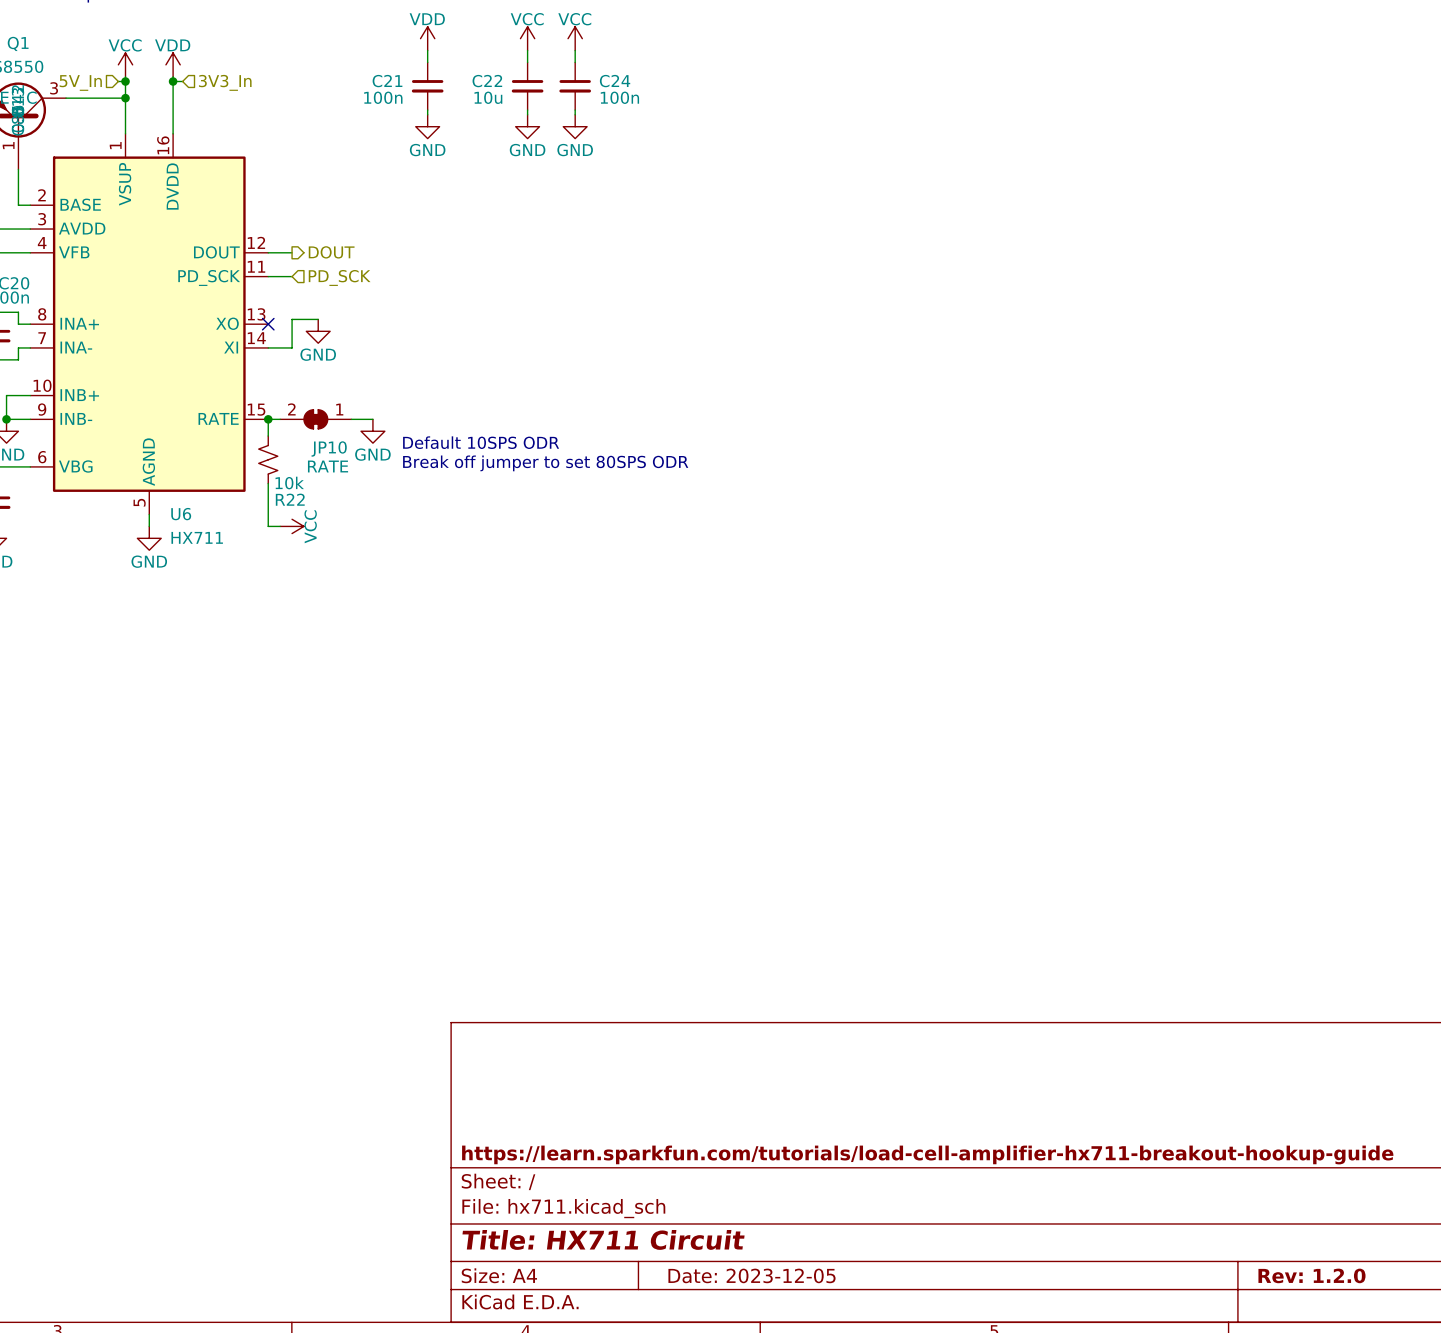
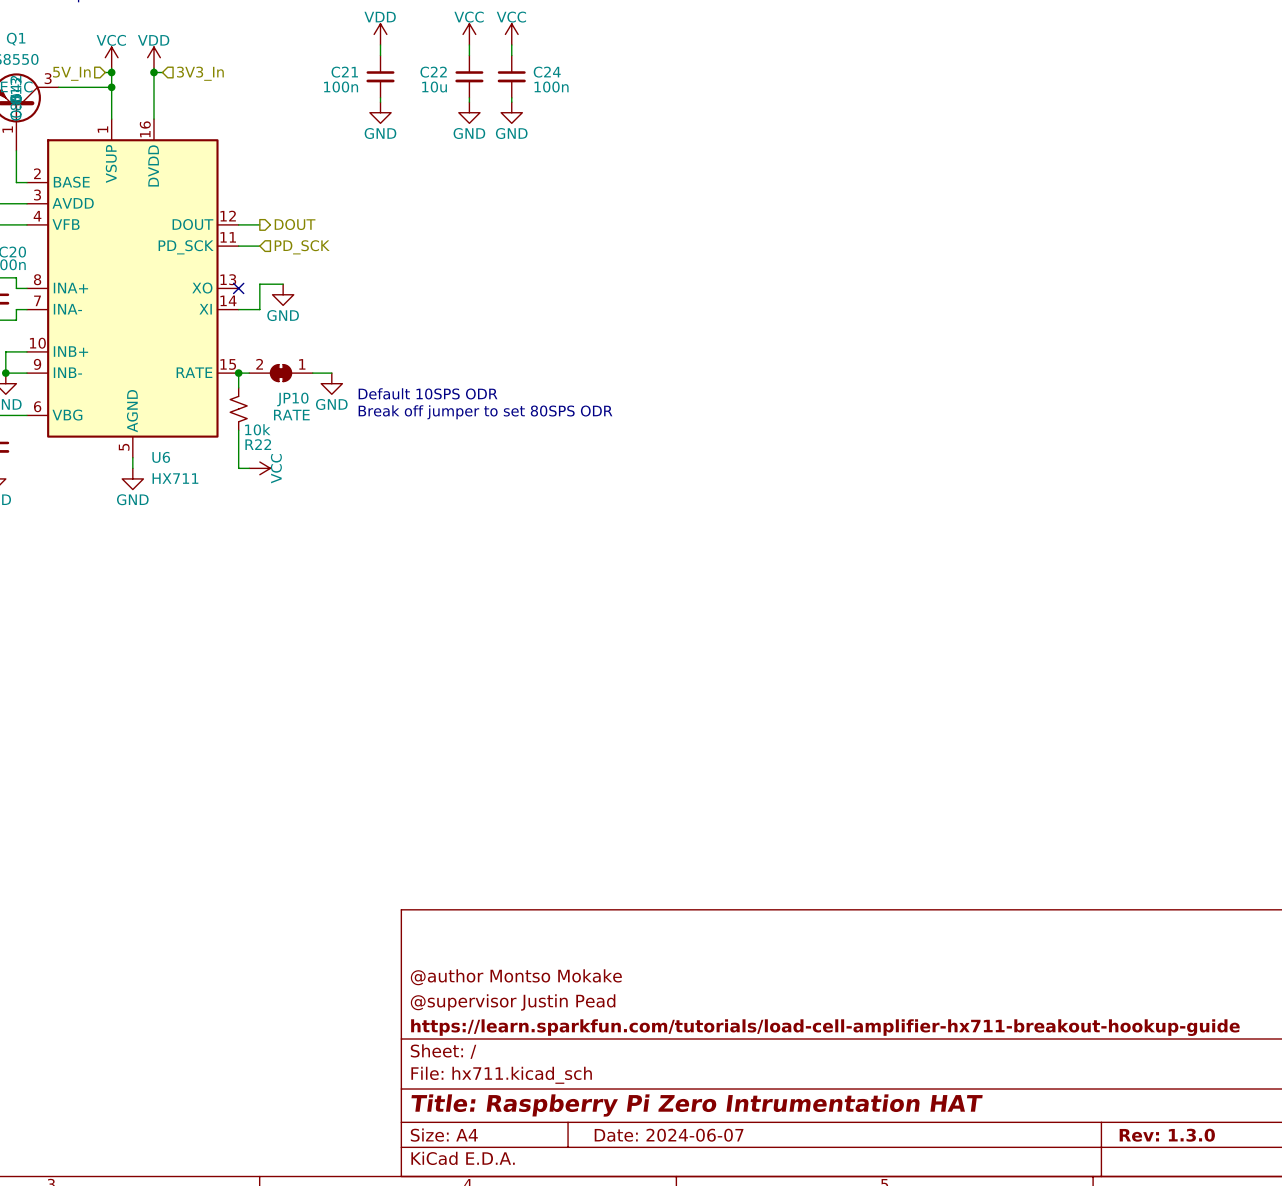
title block: none -> @author Montso Mokake (516, 977)
title block: none -> @supervisor Justin Pead (513, 1002)
title block: Title: HX711 Circuit (603, 1239) -> Title: Raspberry Pi Zero Intrumentation HAT (697, 1105)
title block: Date: 2023-12-05 (751, 1275) -> Date: 2024-06-07 (669, 1135)
title block: Rev: 1.2.0 (1311, 1275) -> Rev: 1.3.0 (1167, 1135)

